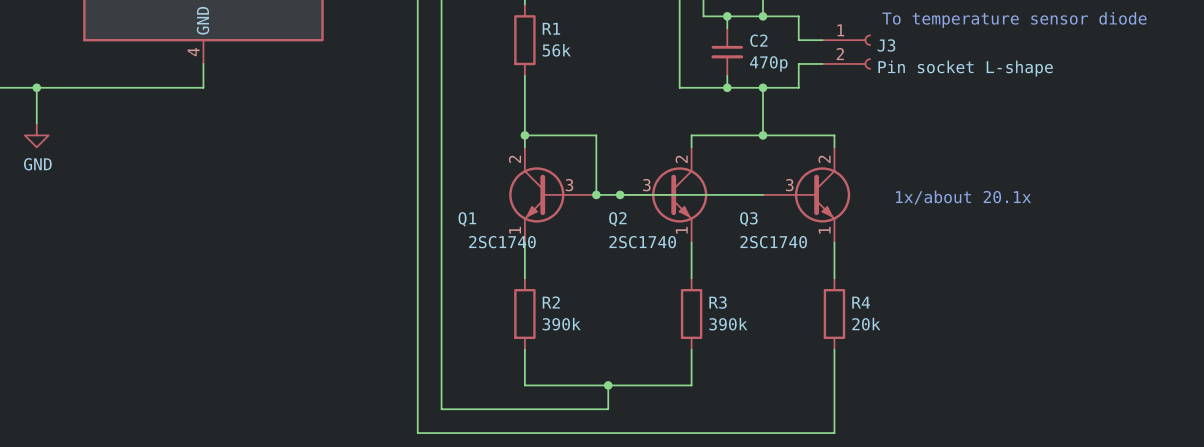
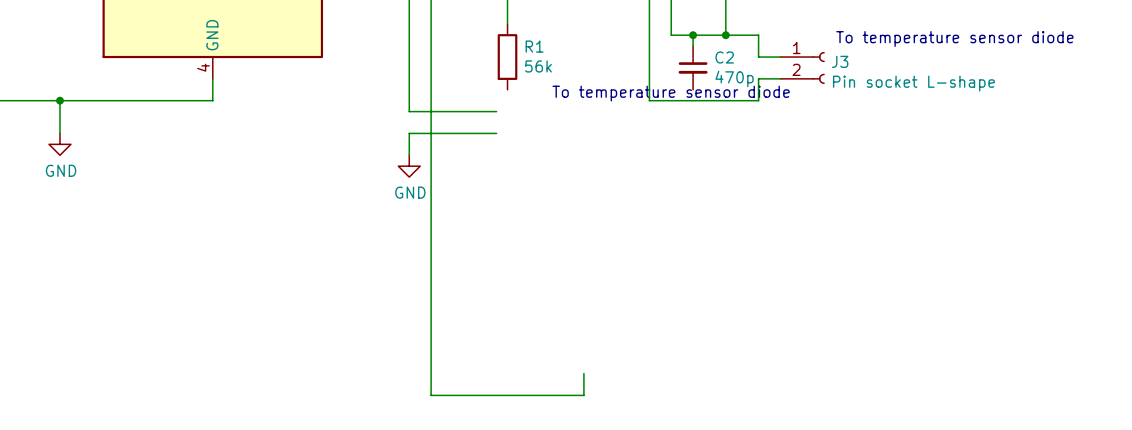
wire: (524, 75) (524, 147) -> none
wire: (727, 75) (727, 87) -> none
text: none -> To temperature sensor diode (671, 93)
junction: (727, 87) -> none
wire: (763, 87) (763, 135) -> none
junction: (763, 87) -> none
wire: (417, 99) (417, 123) -> (409, 111) (496, 111)
wire: none -> (409, 133) (496, 133)
wire: (524, 135) (596, 135) (596, 194) (763, 194) -> none
junction: (524, 135) -> none
junction: (763, 135) -> none
wire: (417, 147) (417, 433) (834, 433) (834, 349) -> none
wire: (691, 147) (691, 135) (834, 135) (834, 147) -> none
power symbol: none -> GND (409, 166)
Q1: 2SC1740 (552, 194) -> none
junction: (596, 194) -> none
junction: (620, 194) -> none
Q2: 2SC1740 (663, 194) -> none
Q3: 2SC1740 (806, 194) -> none
text: 1x/about 20.1x (963, 197) -> none
wire: (524, 242) (524, 278) -> none
wire: (691, 242) (691, 278) -> none
wire: (834, 242) (834, 278) -> none
R2: 390k (524, 314) -> none
R3: 390k (691, 314) -> none
R4: 20k (834, 314) -> none
wire: (524, 349) (524, 385) (691, 385) (691, 349) -> none
junction: (608, 385) -> none

